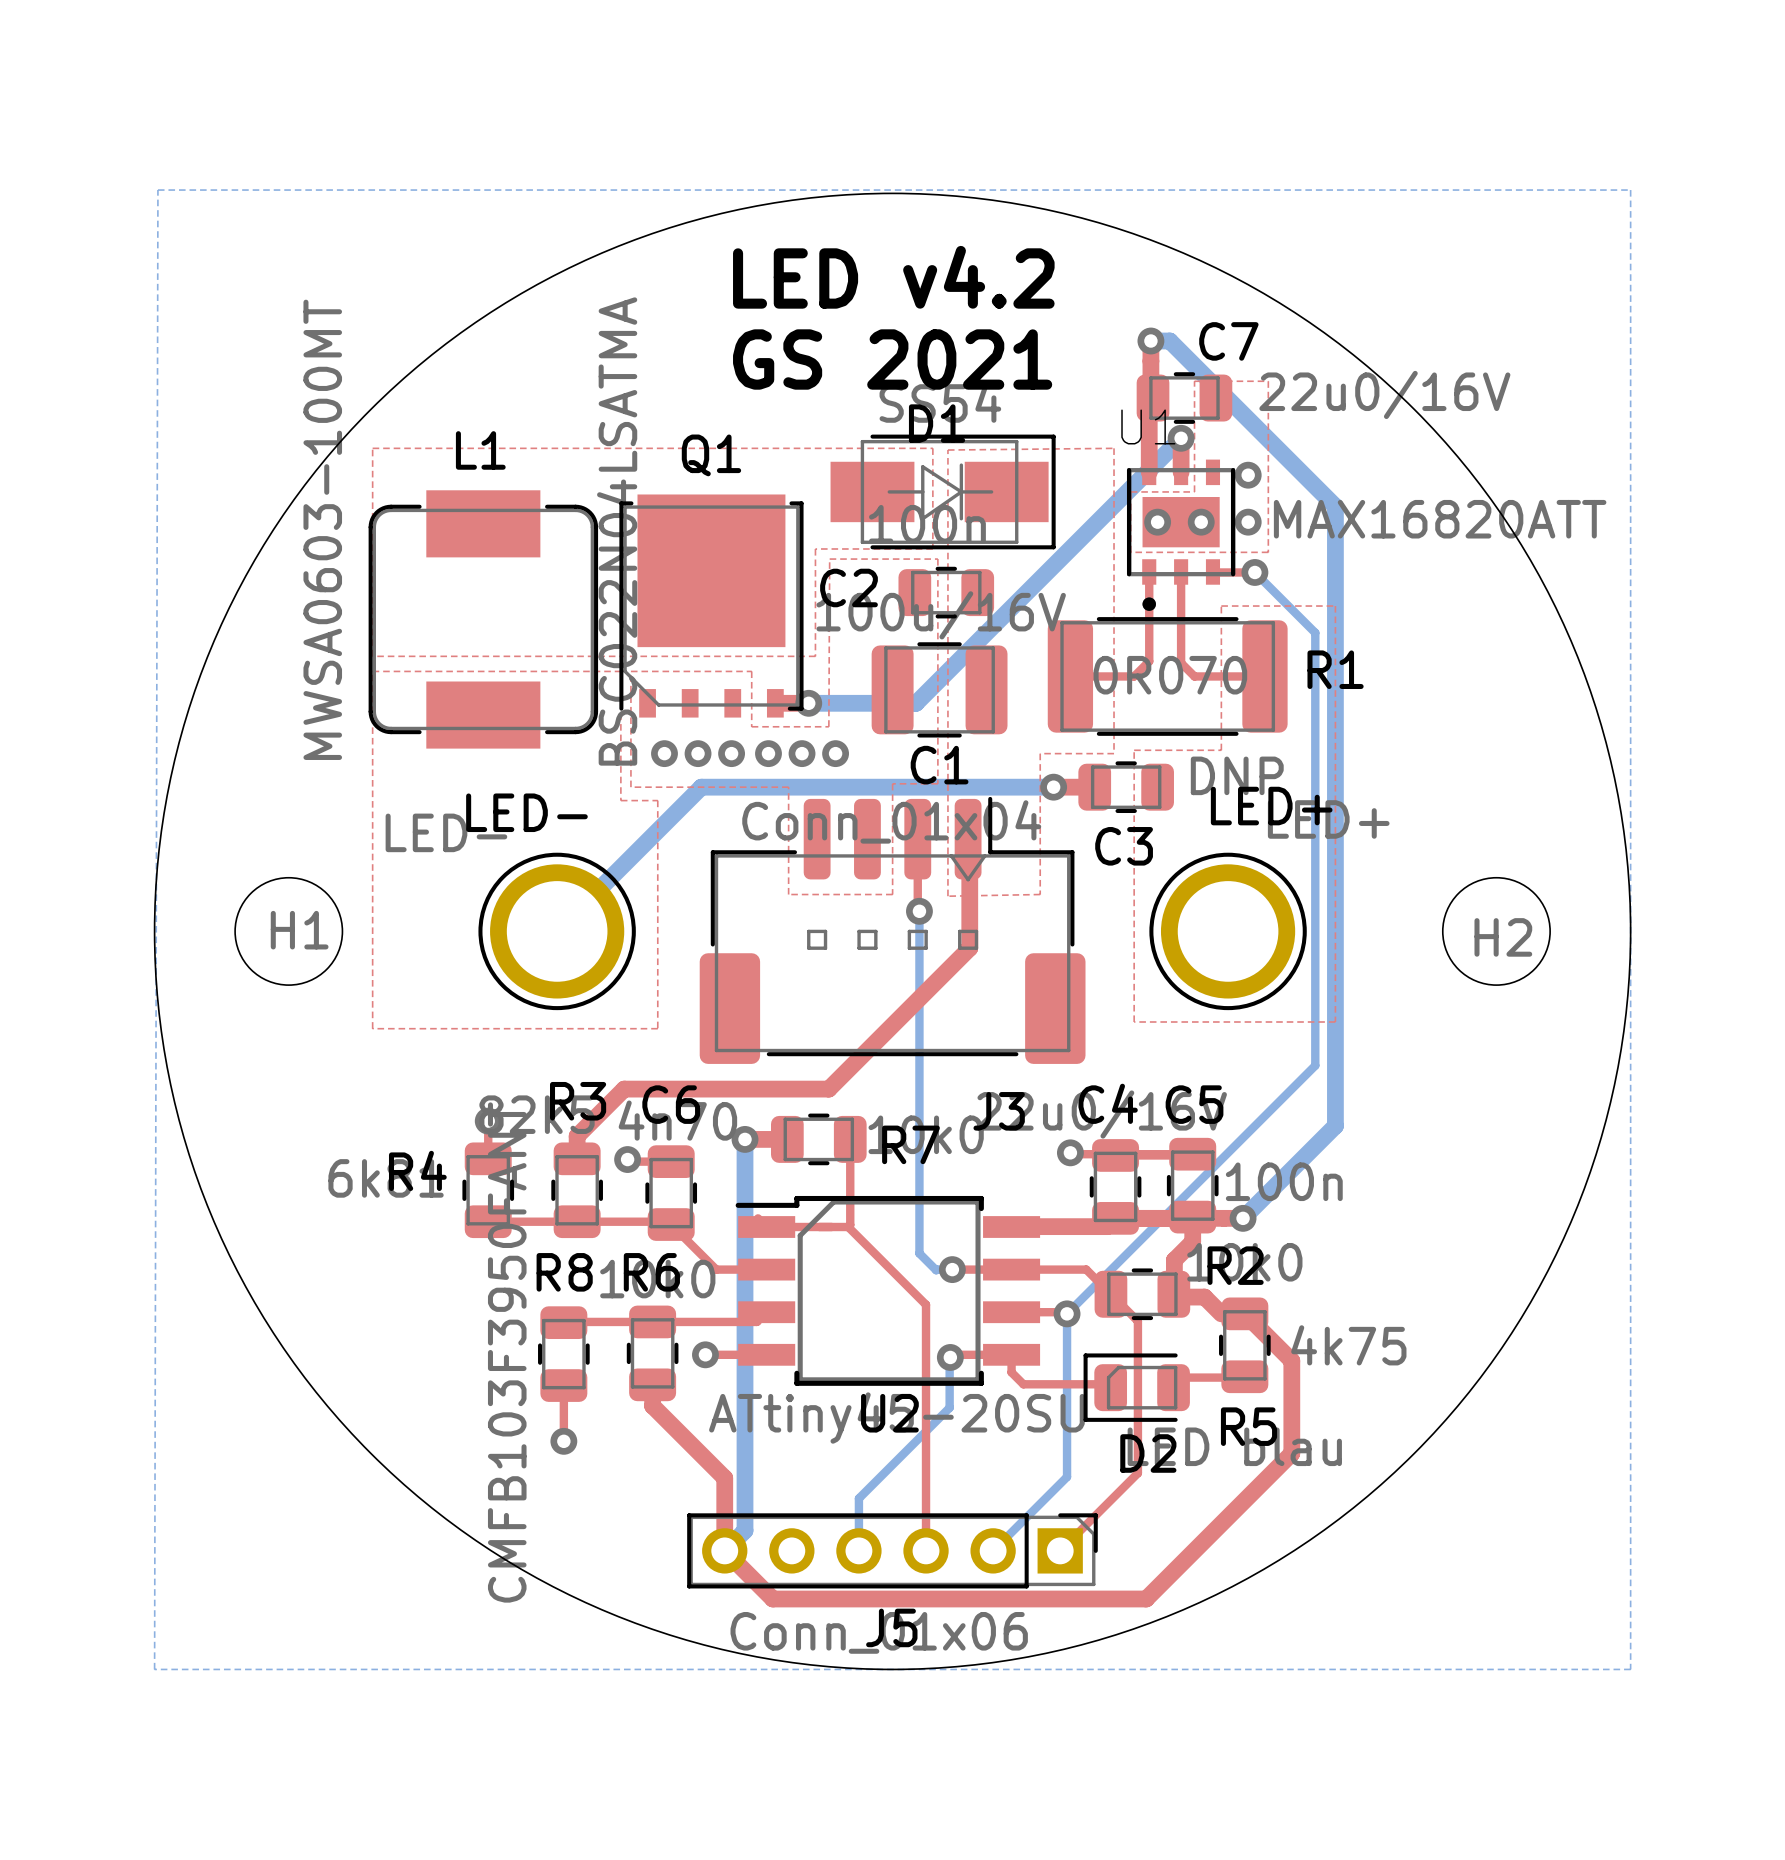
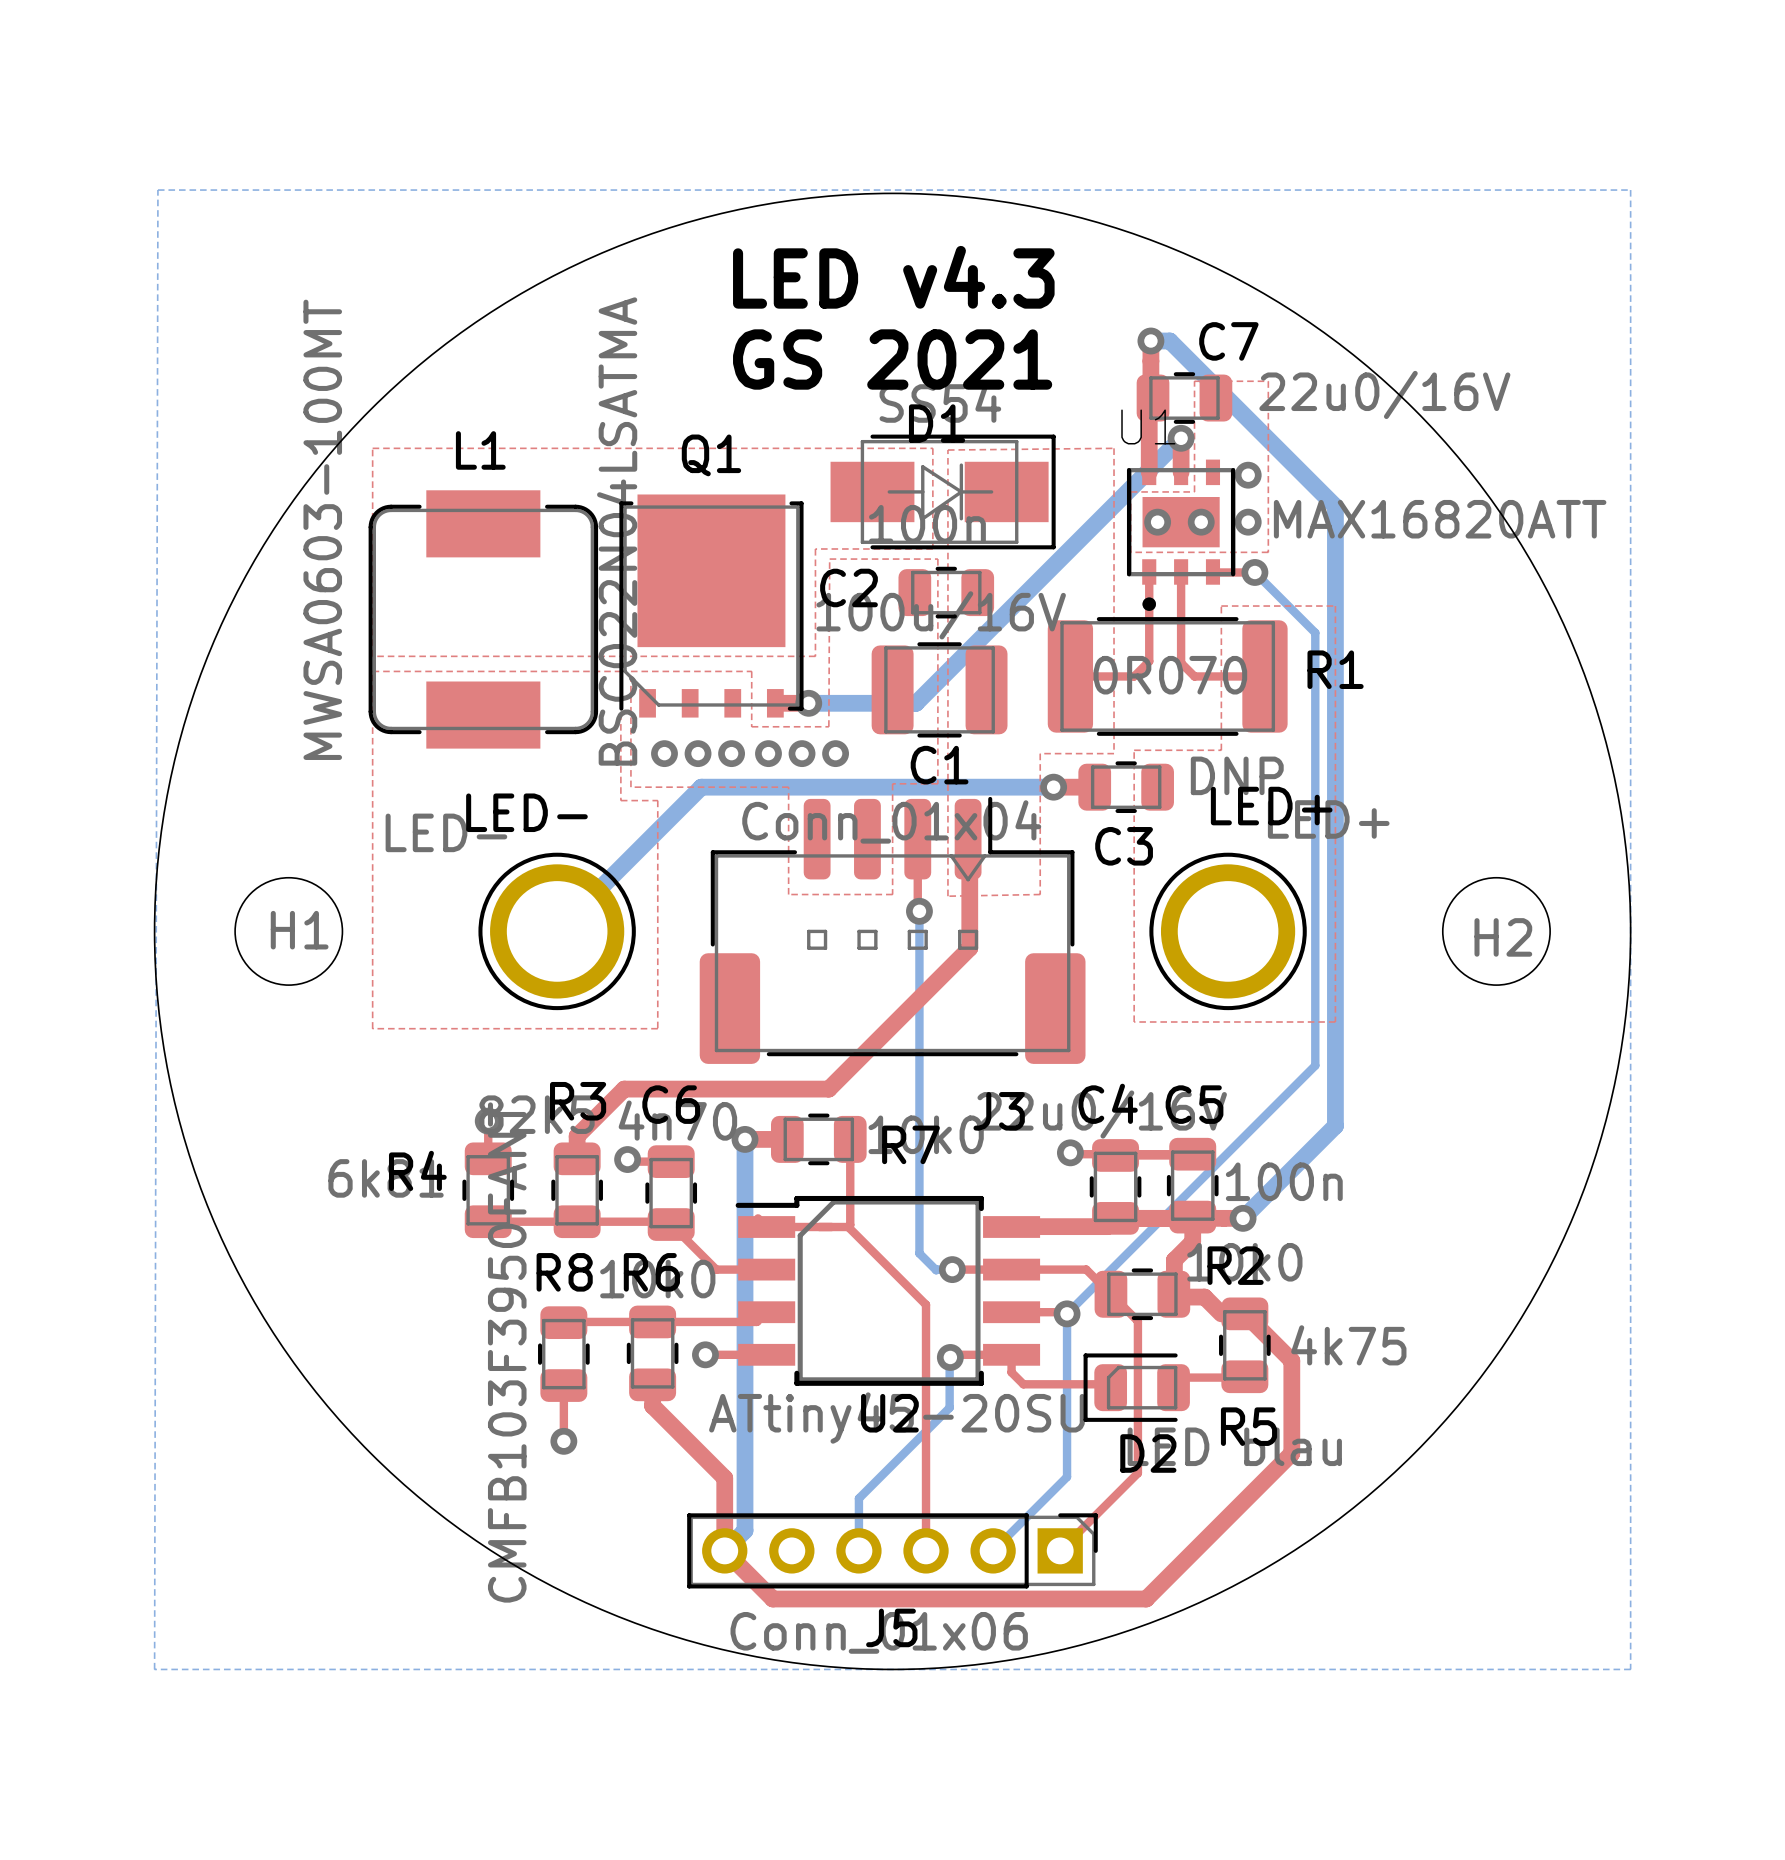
text: LED v4.2 (893, 277) -> LED v4.3 (893, 277)

